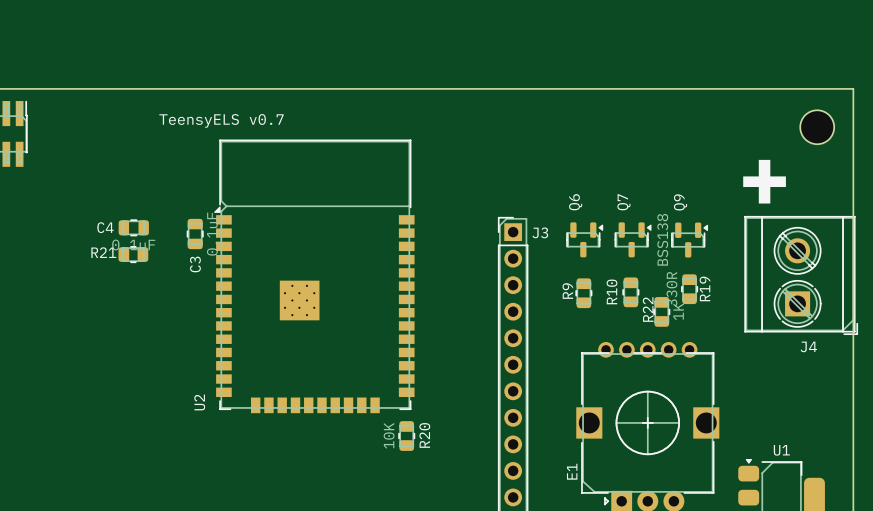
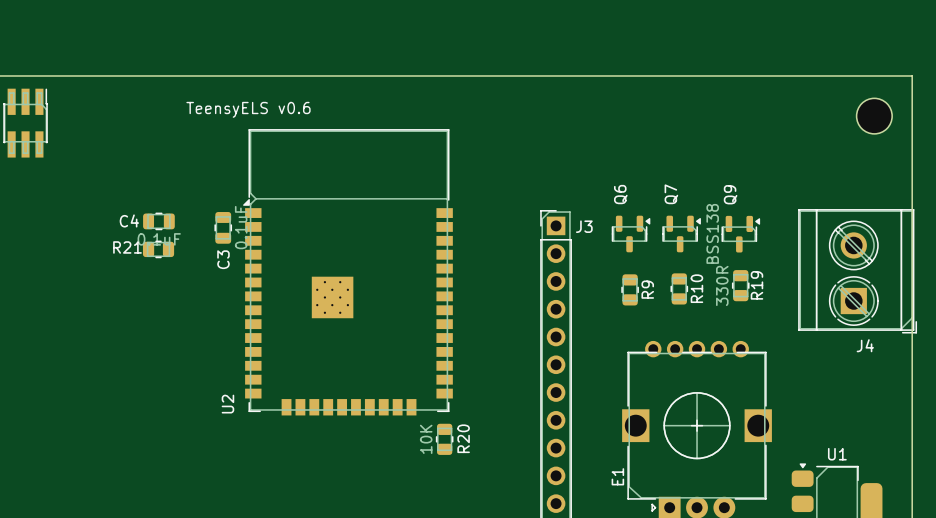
text: TeensyELS v0.7 (221, 120) -> TeensyELS v0.6 (248, 109)
text: + (764, 181) -> none
R9 name position: R9 (567, 291) -> R9 (647, 289)
R10 name position: R10 (611, 291) -> R10 (696, 288)
R22: 1K (661, 311) -> none

